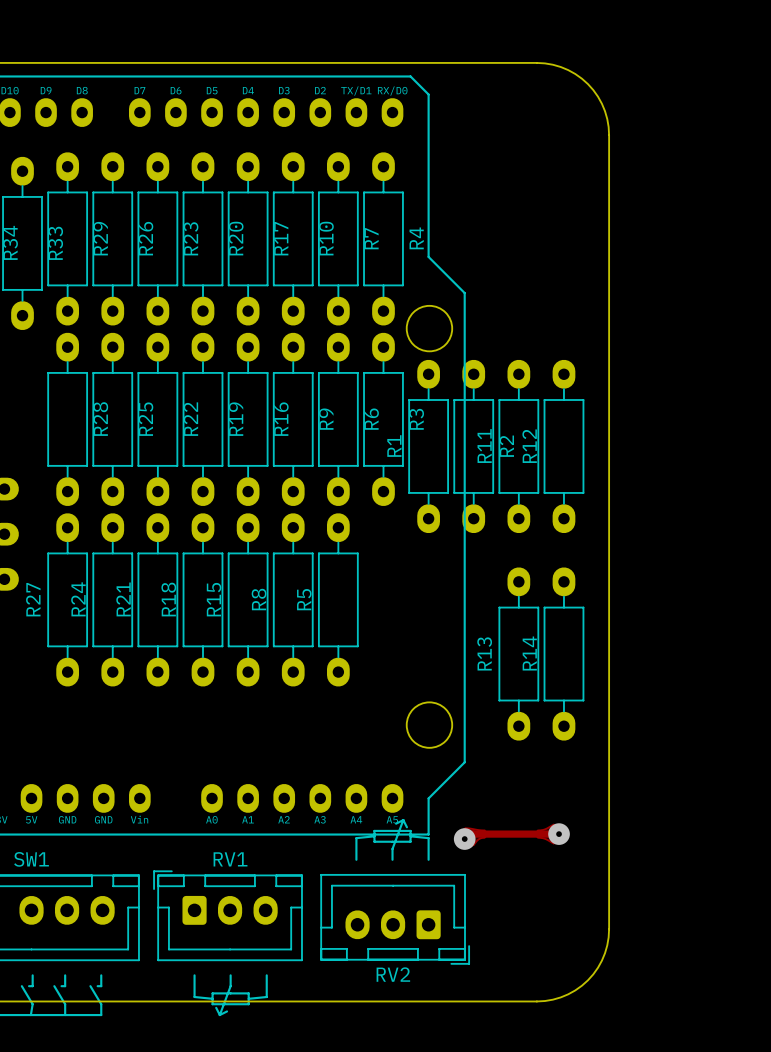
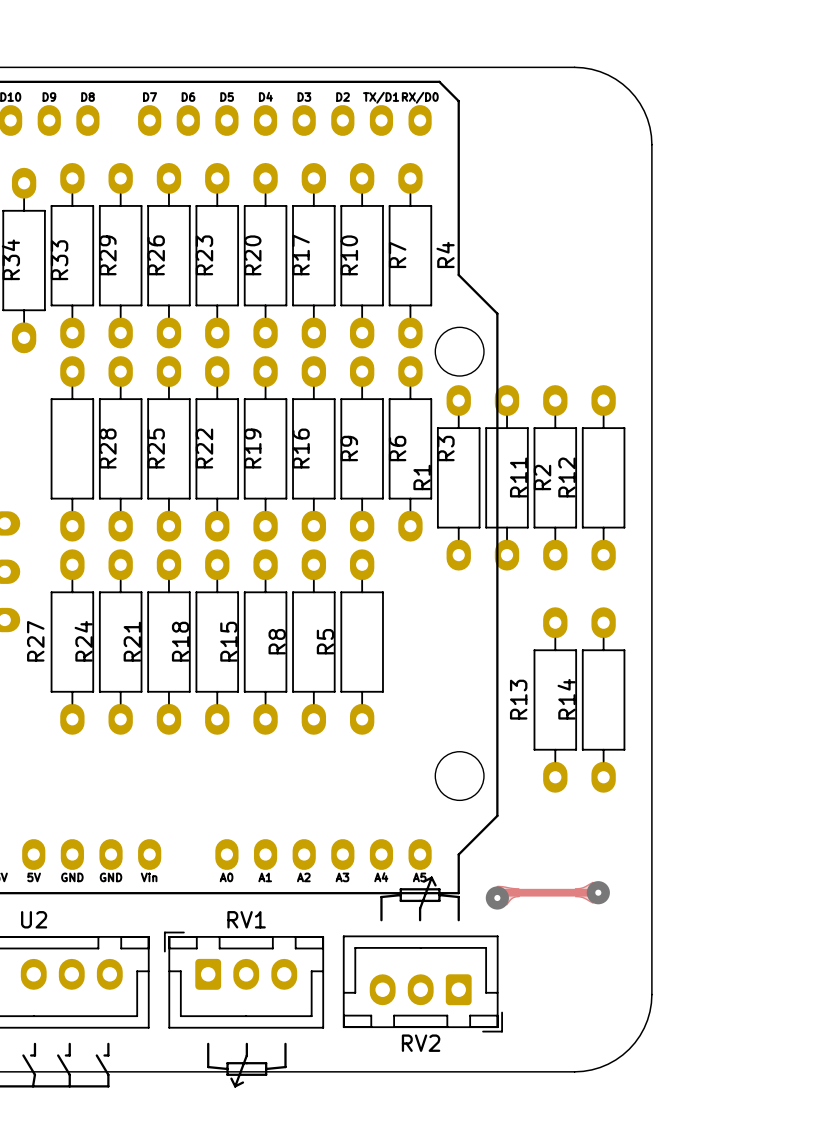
SW1 name: SW1 (31, 859) -> U2 (34, 919)

